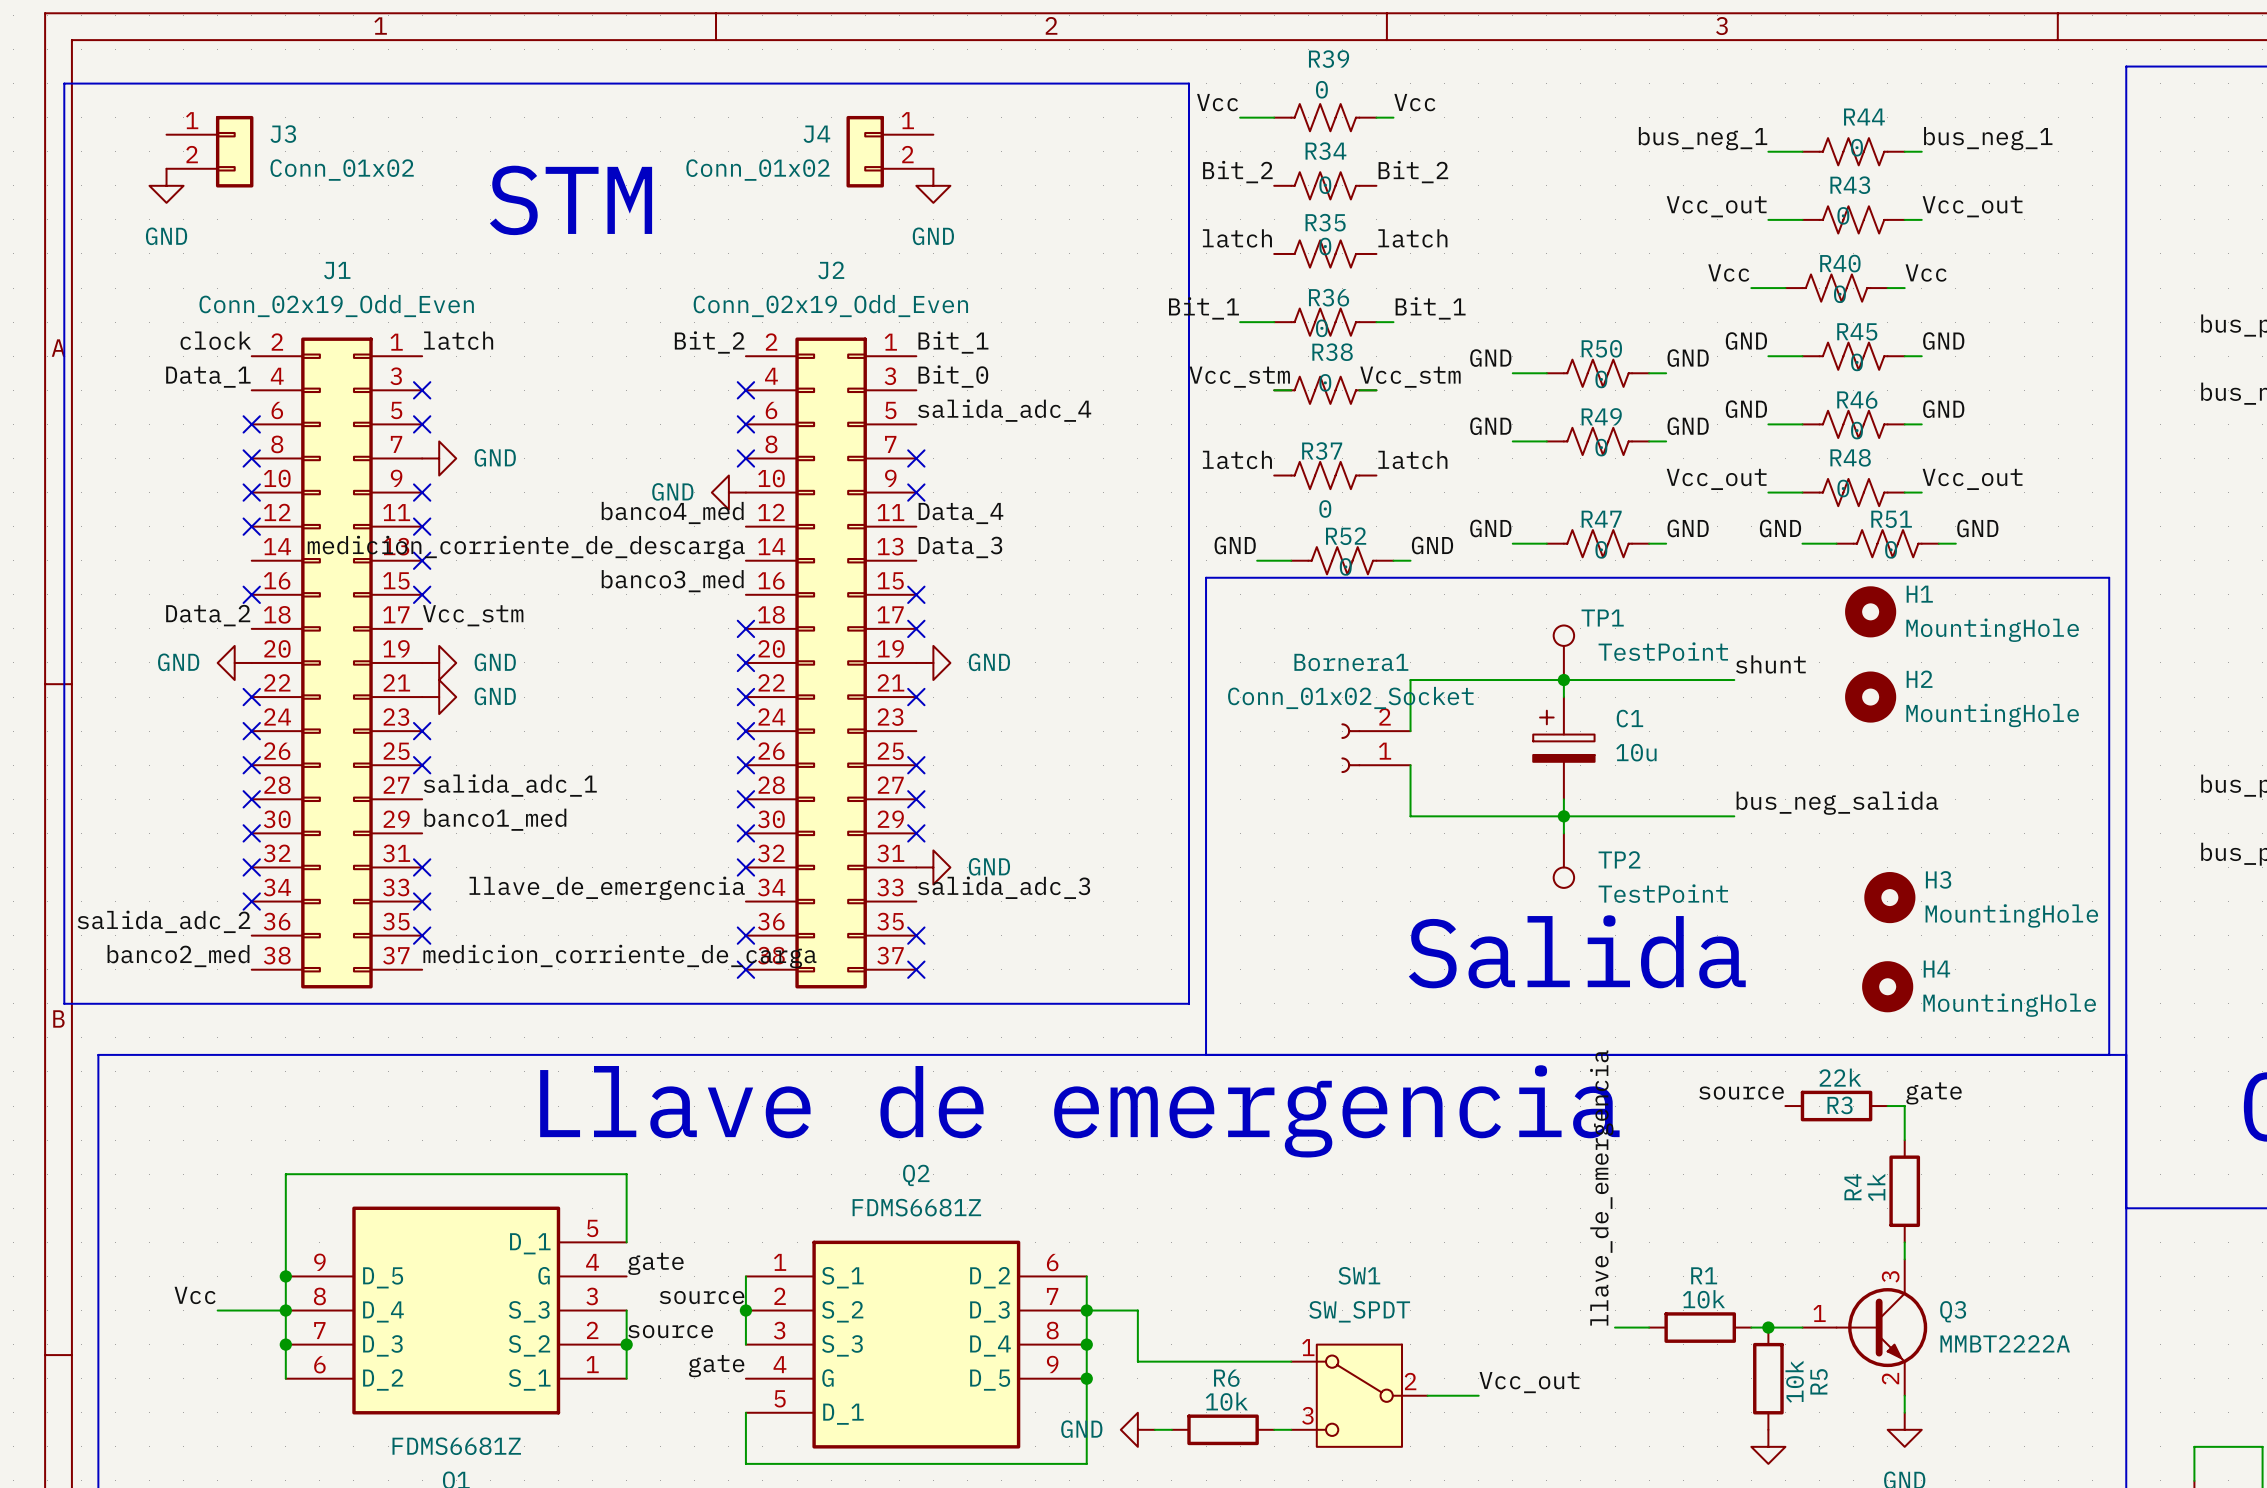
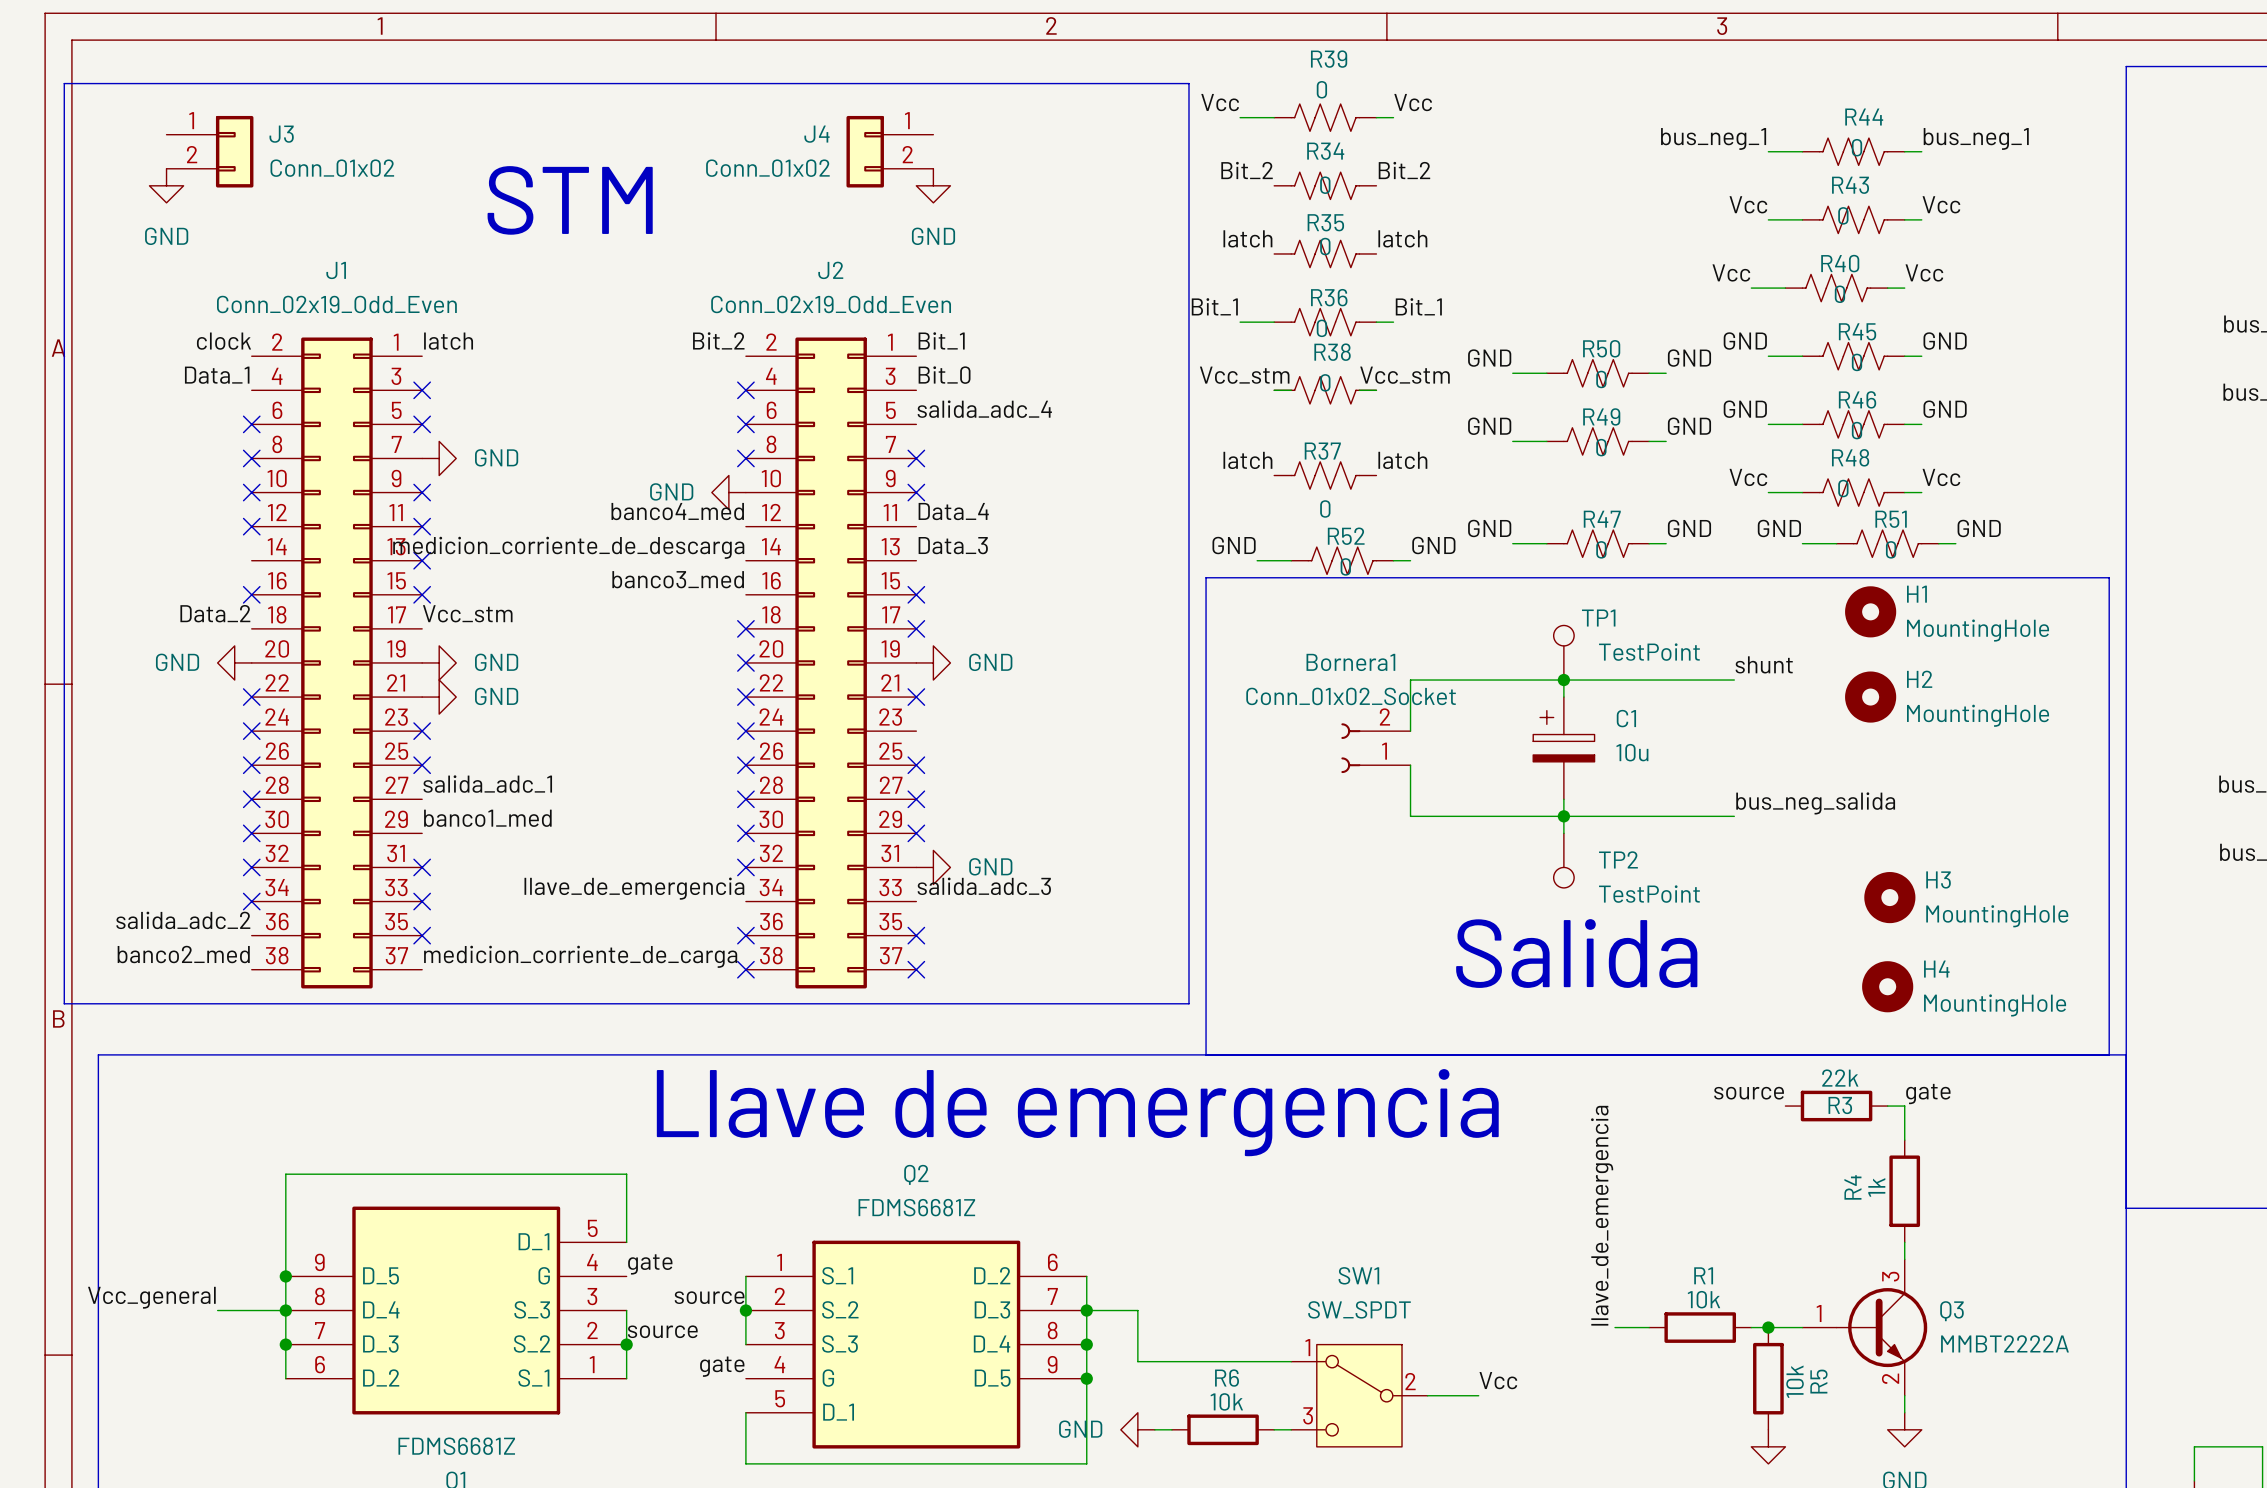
label: Vcc_out (1716, 206) -> Vcc (1748, 204)
label: Vcc_out (1972, 206) -> Vcc (1941, 204)
label: Vcc_out (1716, 479) -> Vcc (1748, 477)
label: Vcc_out (1972, 479) -> Vcc (1941, 477)
label: Vcc (195, 1295) -> Vcc_general (151, 1297)
label: Vcc_out (1529, 1382) -> Vcc (1498, 1380)

